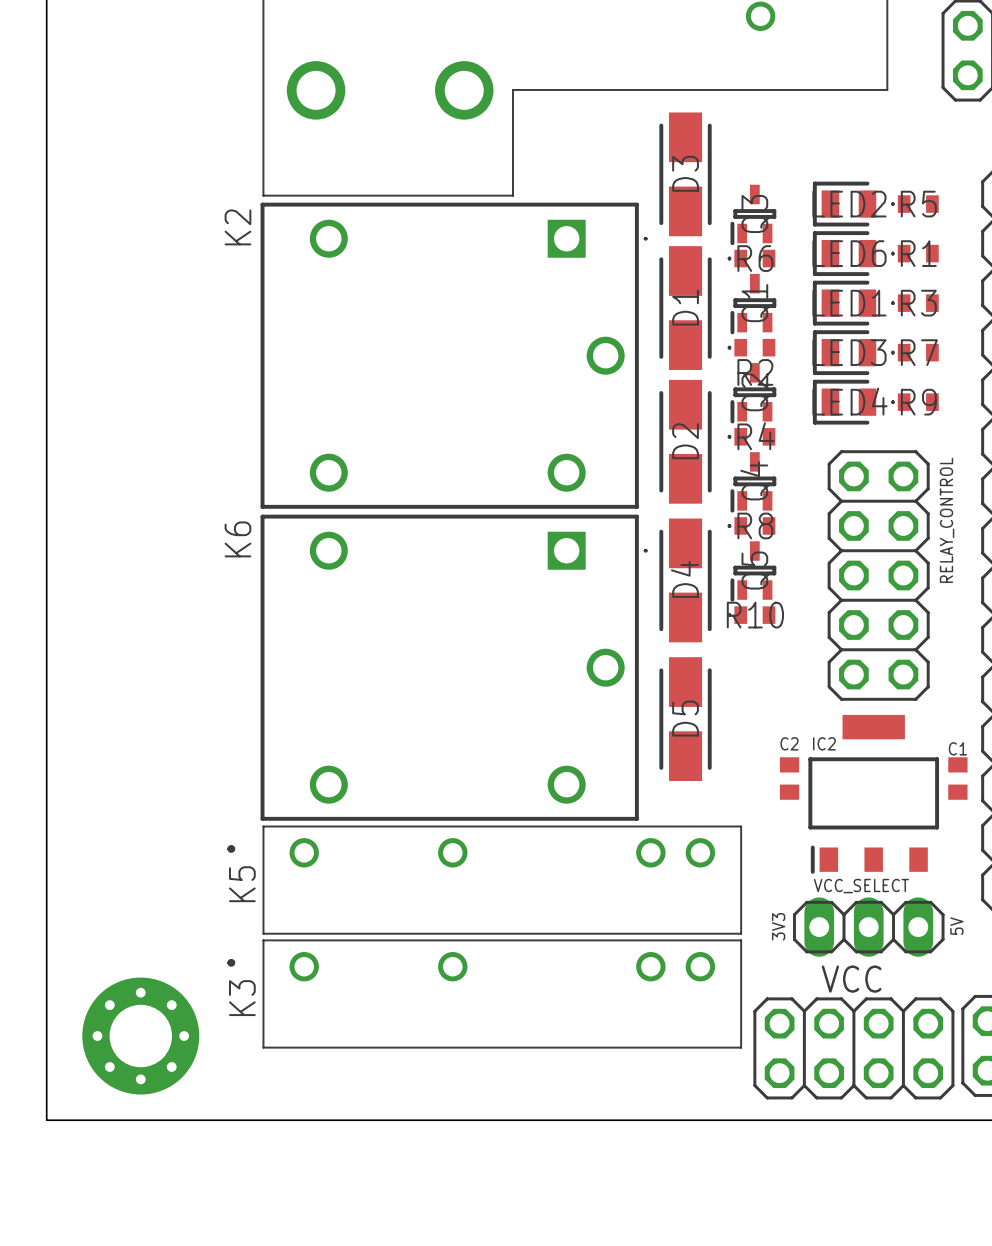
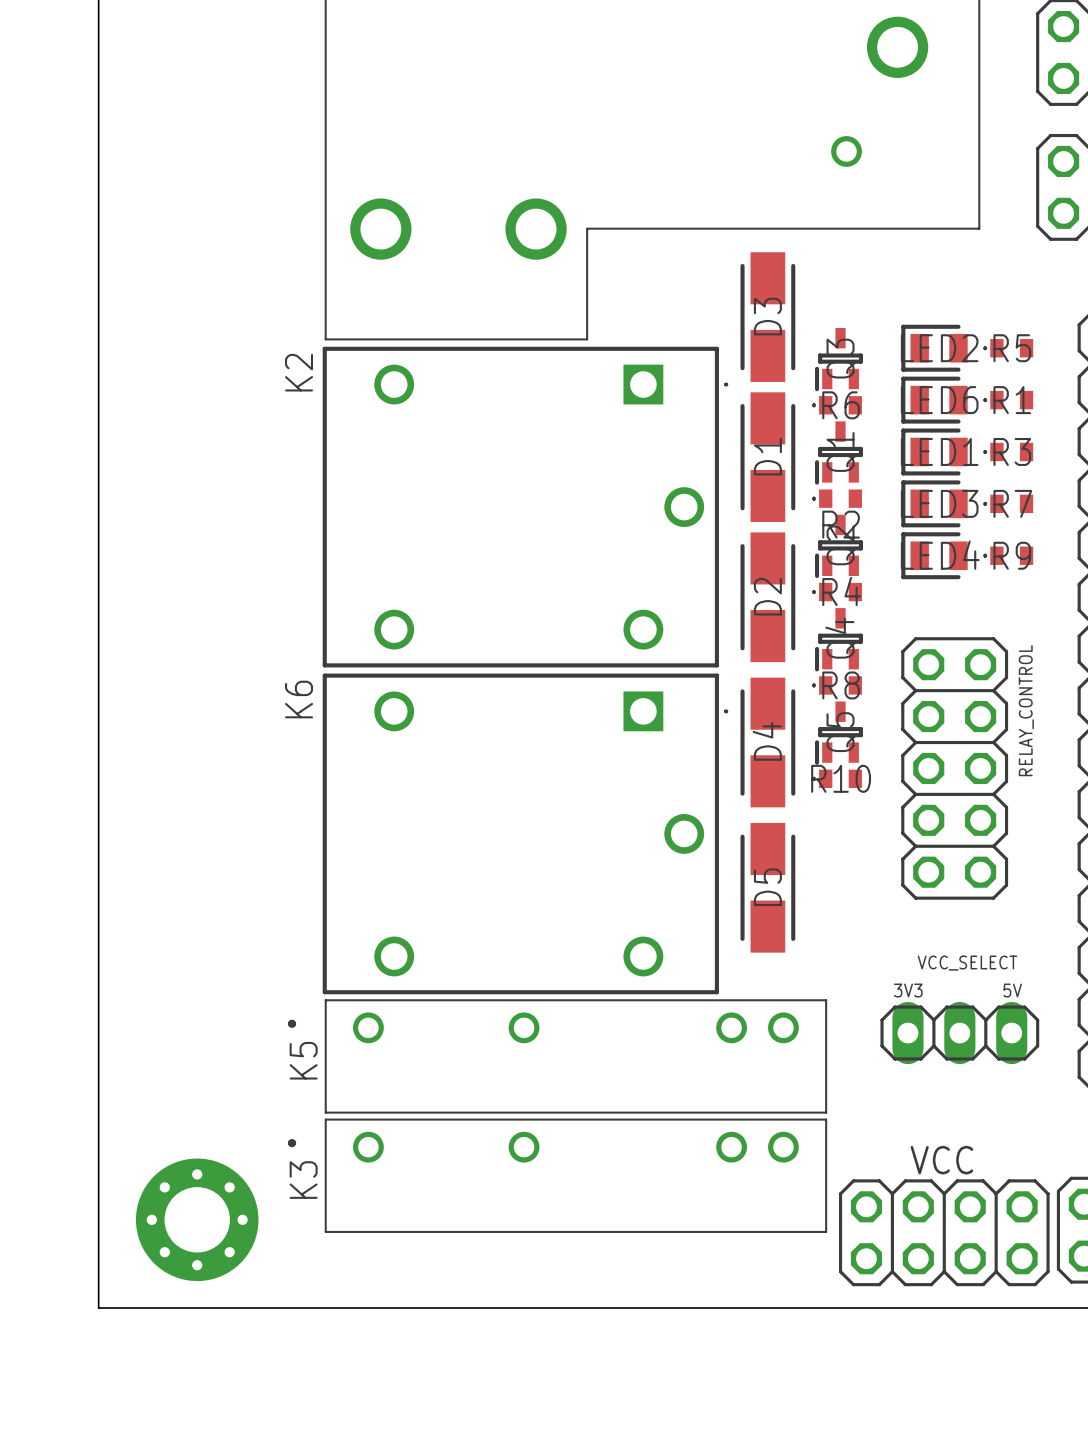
RELAY_CONTROL position: (878, 575) -> (954, 768)
C2: (789, 778) -> none
C1: (957, 778) -> none
IC2: (873, 794) -> none
VCC_SELECT name position: VCC_SELECT (861, 886) -> VCC_SELECT (967, 963)
text rotation: 0° (778, 926) -> 90° clockwise (908, 990)
text position: 3V3 (778, 926) -> 3V3 (908, 990)
text rotation: 0° (956, 926) -> 90° clockwise (1012, 990)
text position: 5V (956, 926) -> 5V (1012, 990)
VCC_SELECT position: (868, 927) -> (959, 1033)

